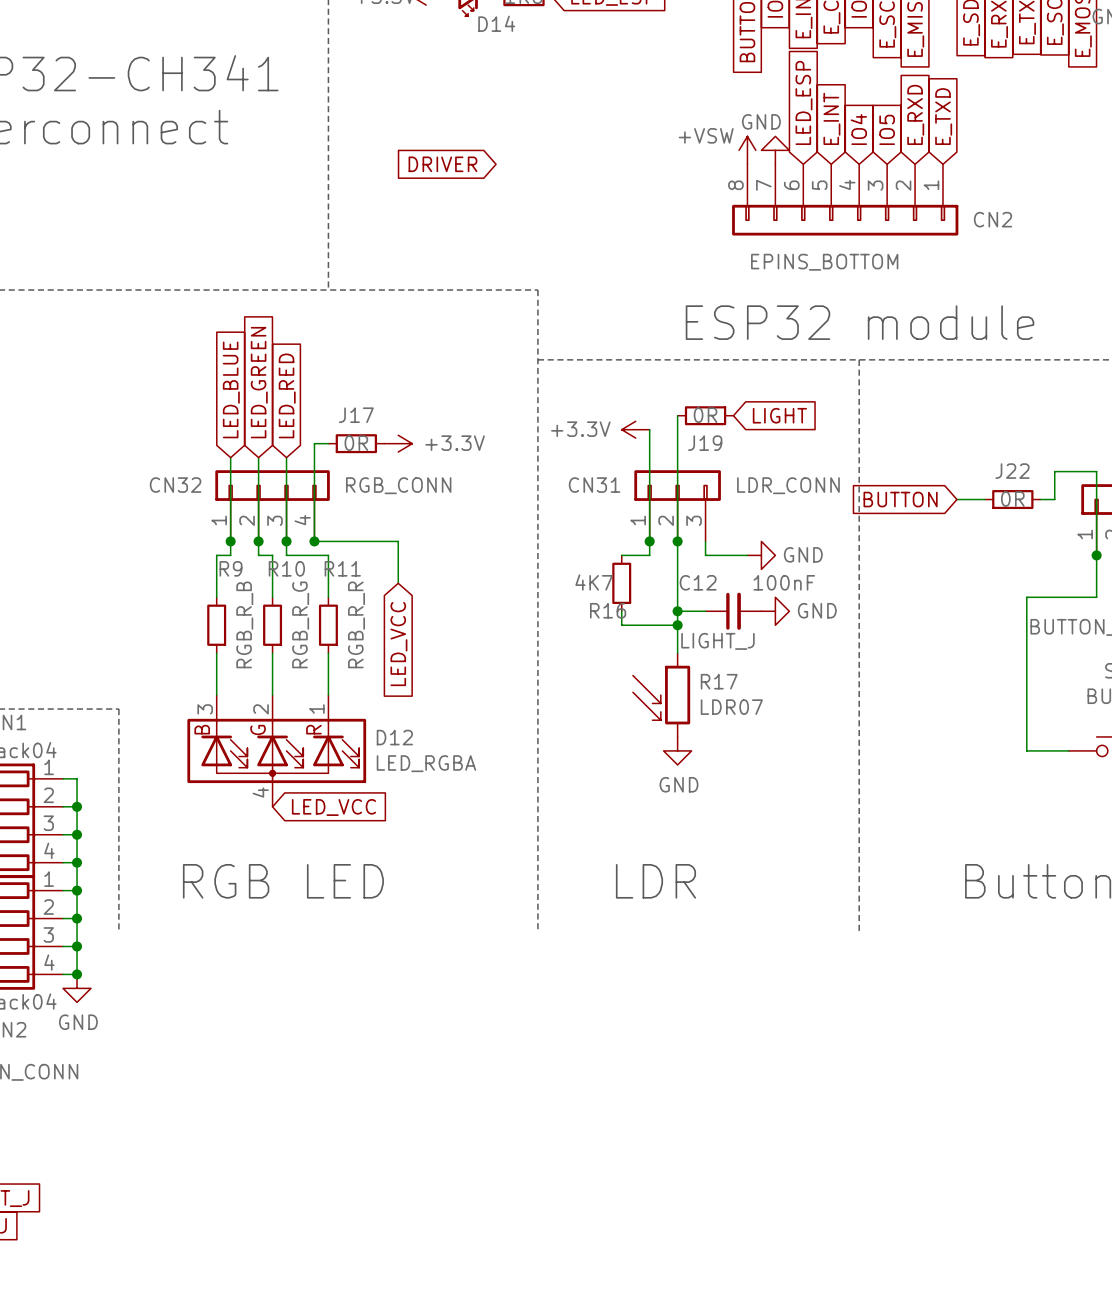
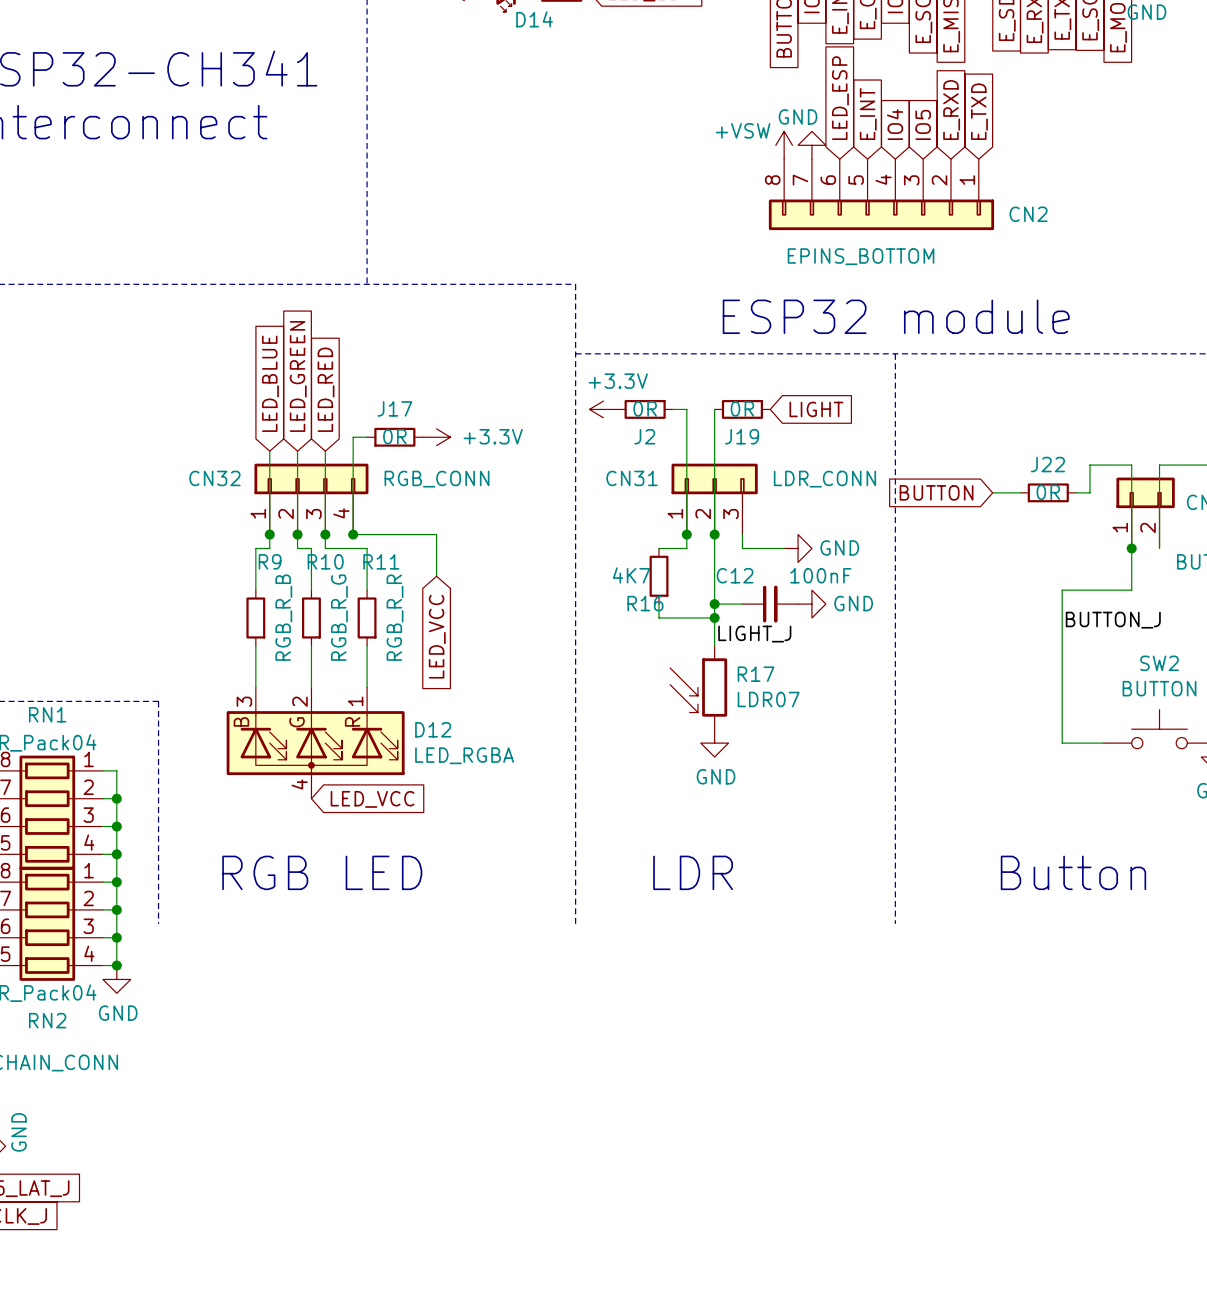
global label: DRIVER (442, 164) -> none
J2: none -> 0R (645, 409)
wire: none -> (672, 409) (686, 409) (686, 423)
power symbol text position: +3.3V (580, 429) -> +3.3V (618, 381)
power symbol position: +3.3V (635, 429) -> +3.3V (603, 409)

